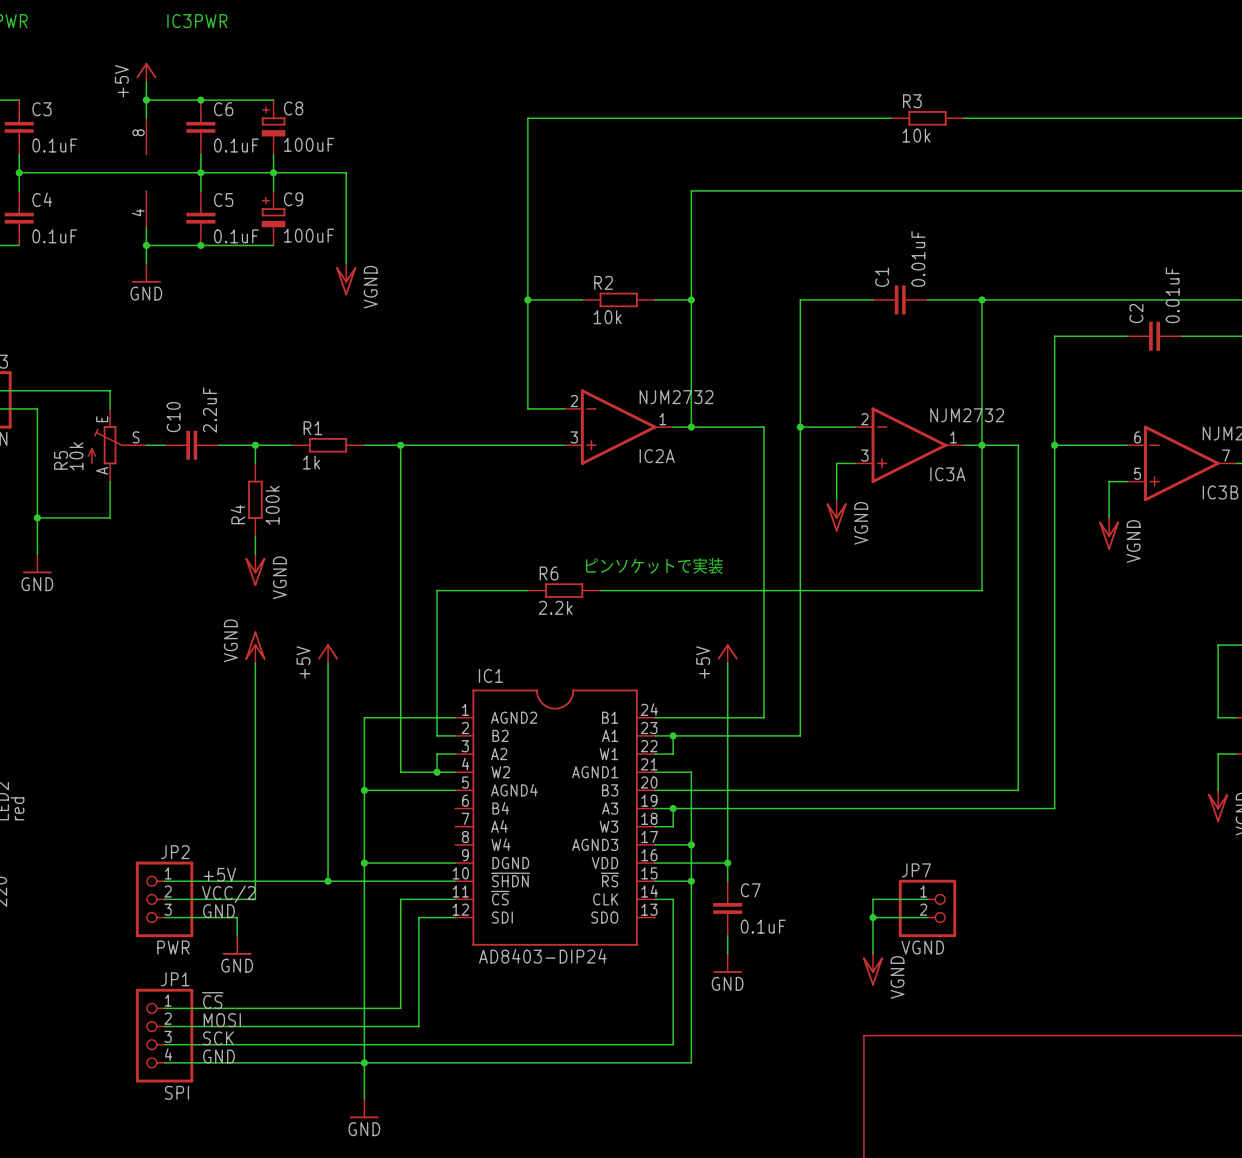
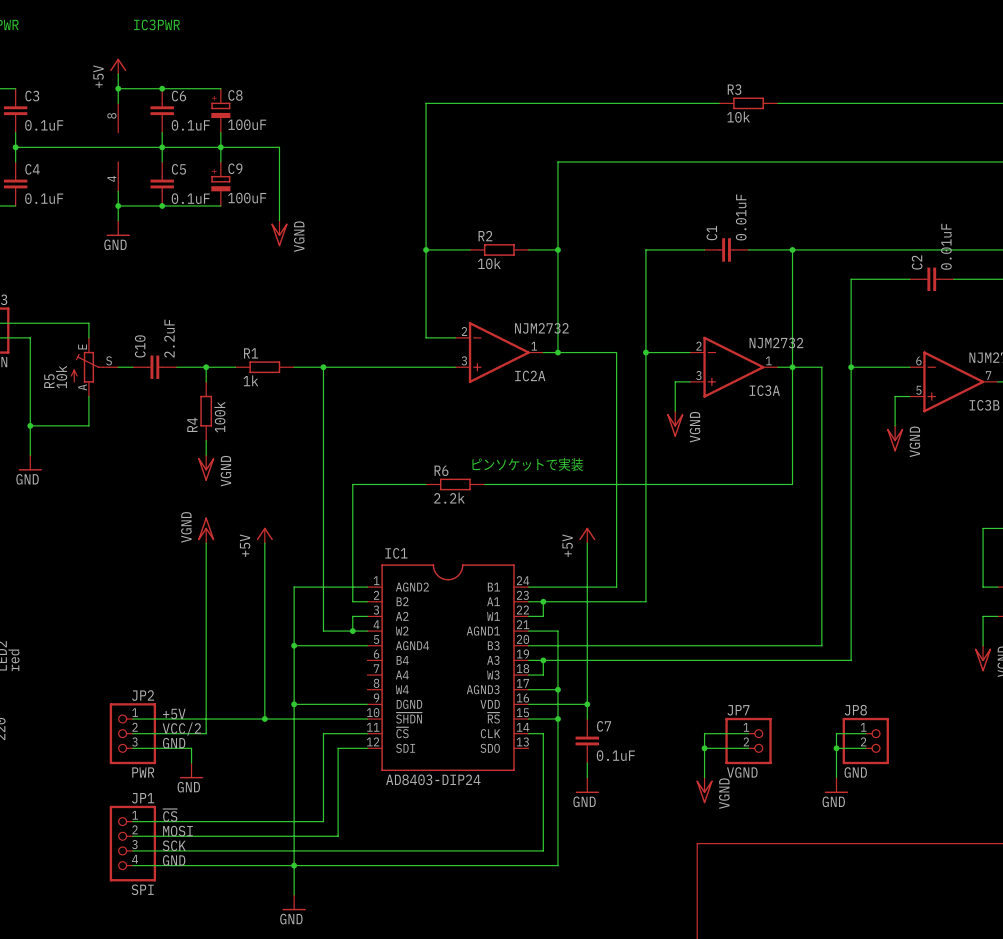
wire: none -> (865, 733) (836, 733) (836, 777)
JP8: none -> GND (865, 741)
wire: none -> (836, 748) (865, 748)
junction: none -> (836, 748)
power symbol: none -> GND (836, 785)

